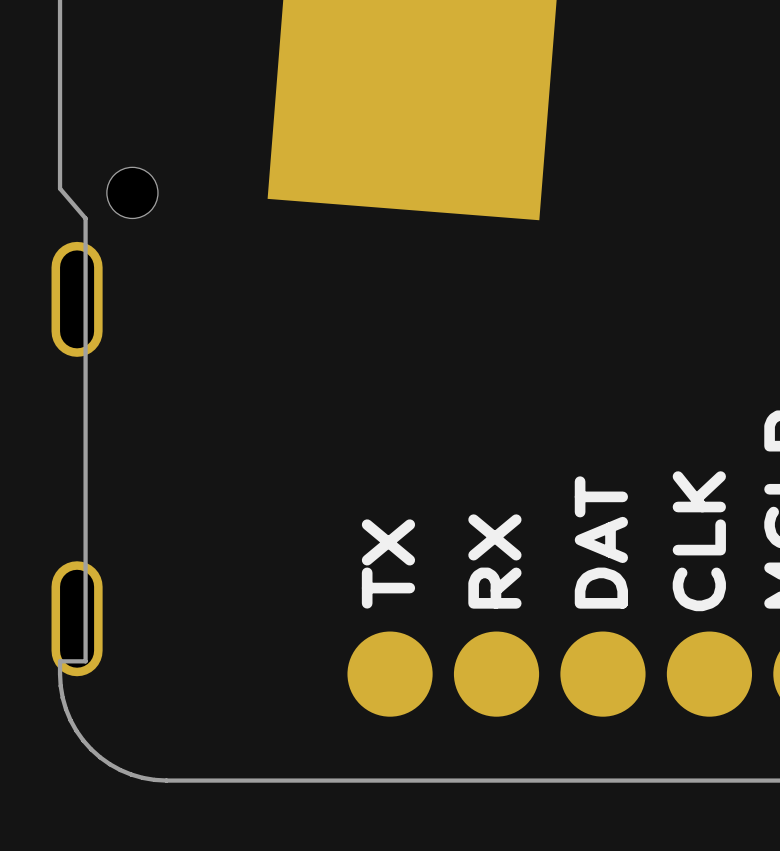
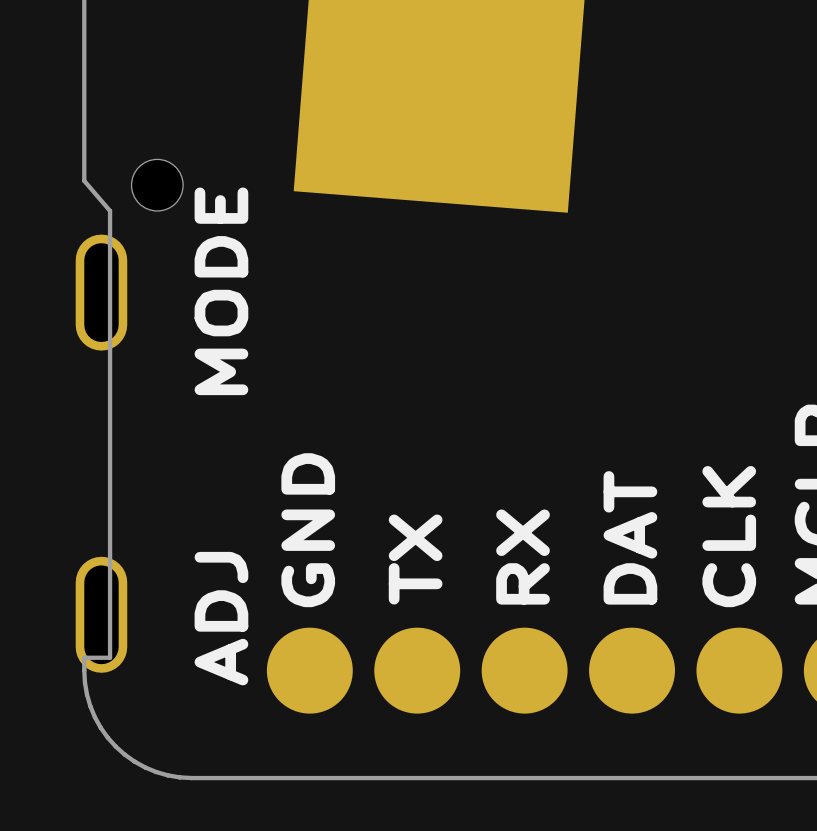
text: none -> MODE (221, 291)
text: none -> ADJ (221, 618)
GND: none -> (309, 670)

